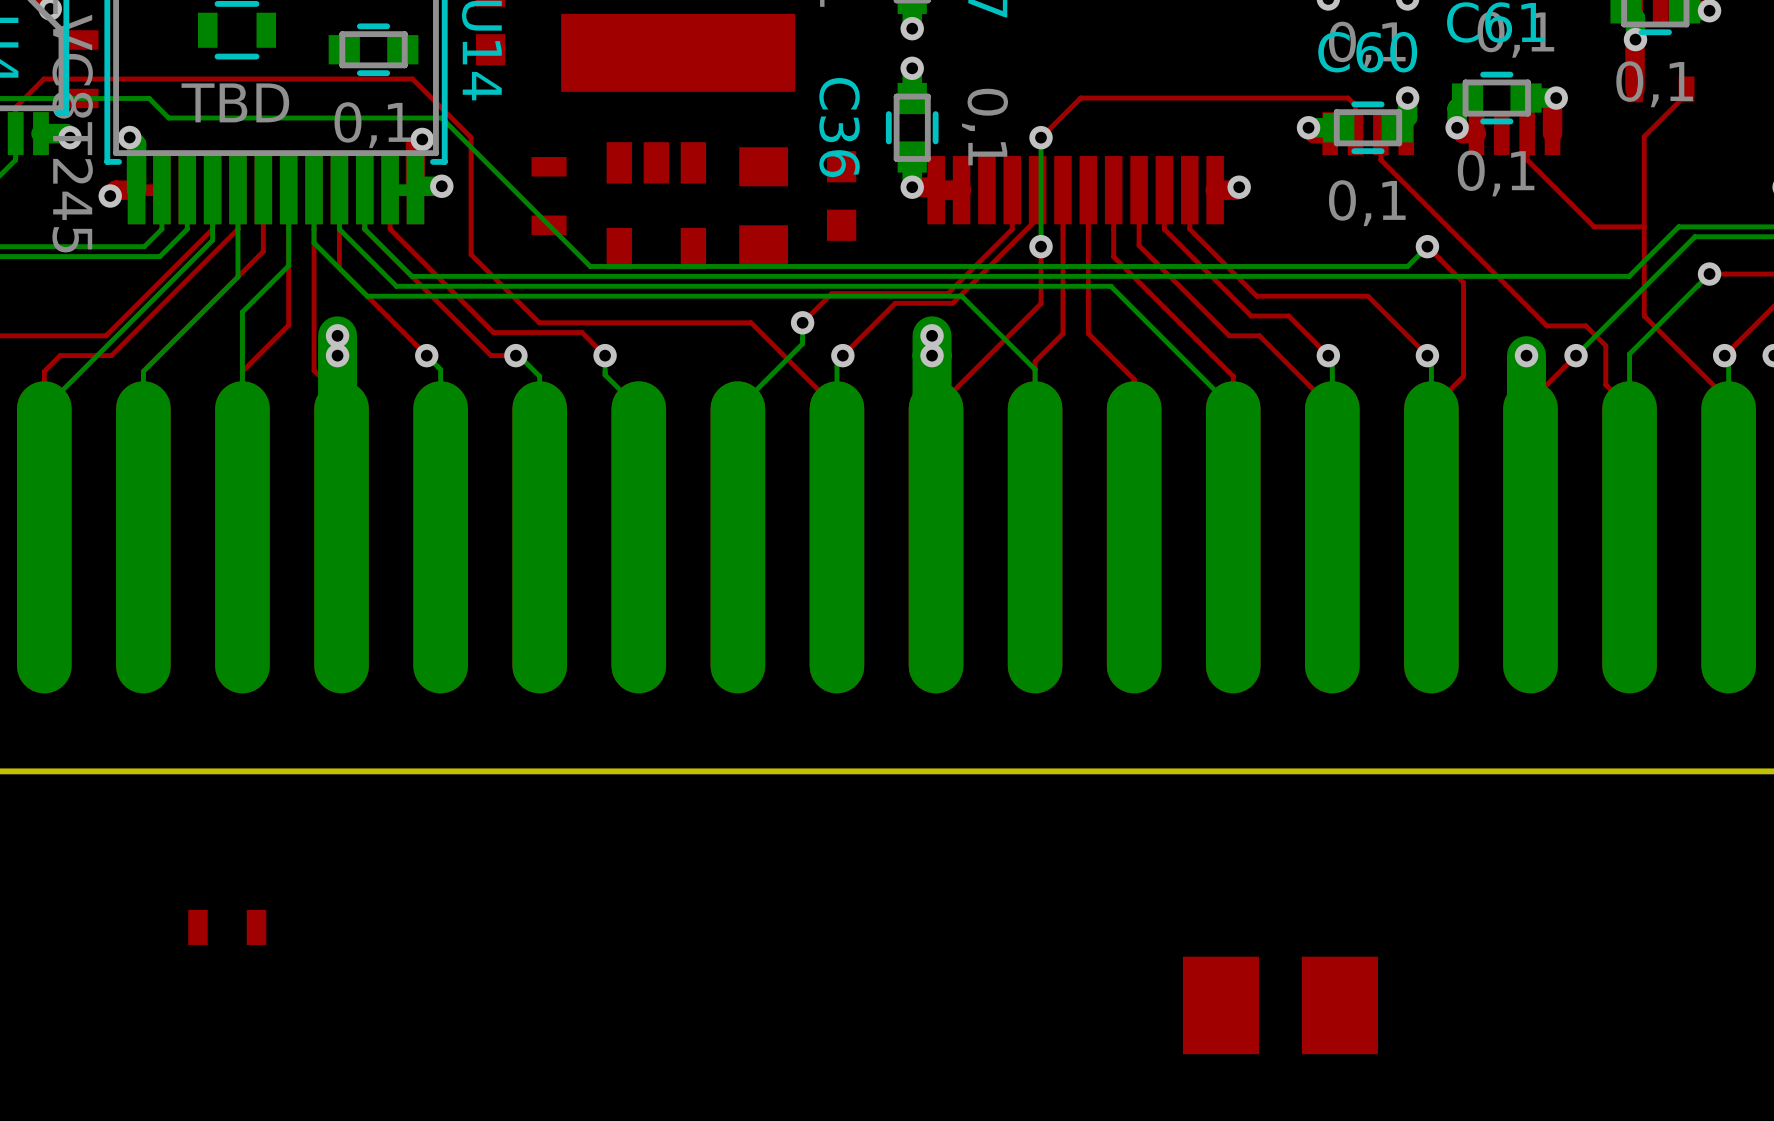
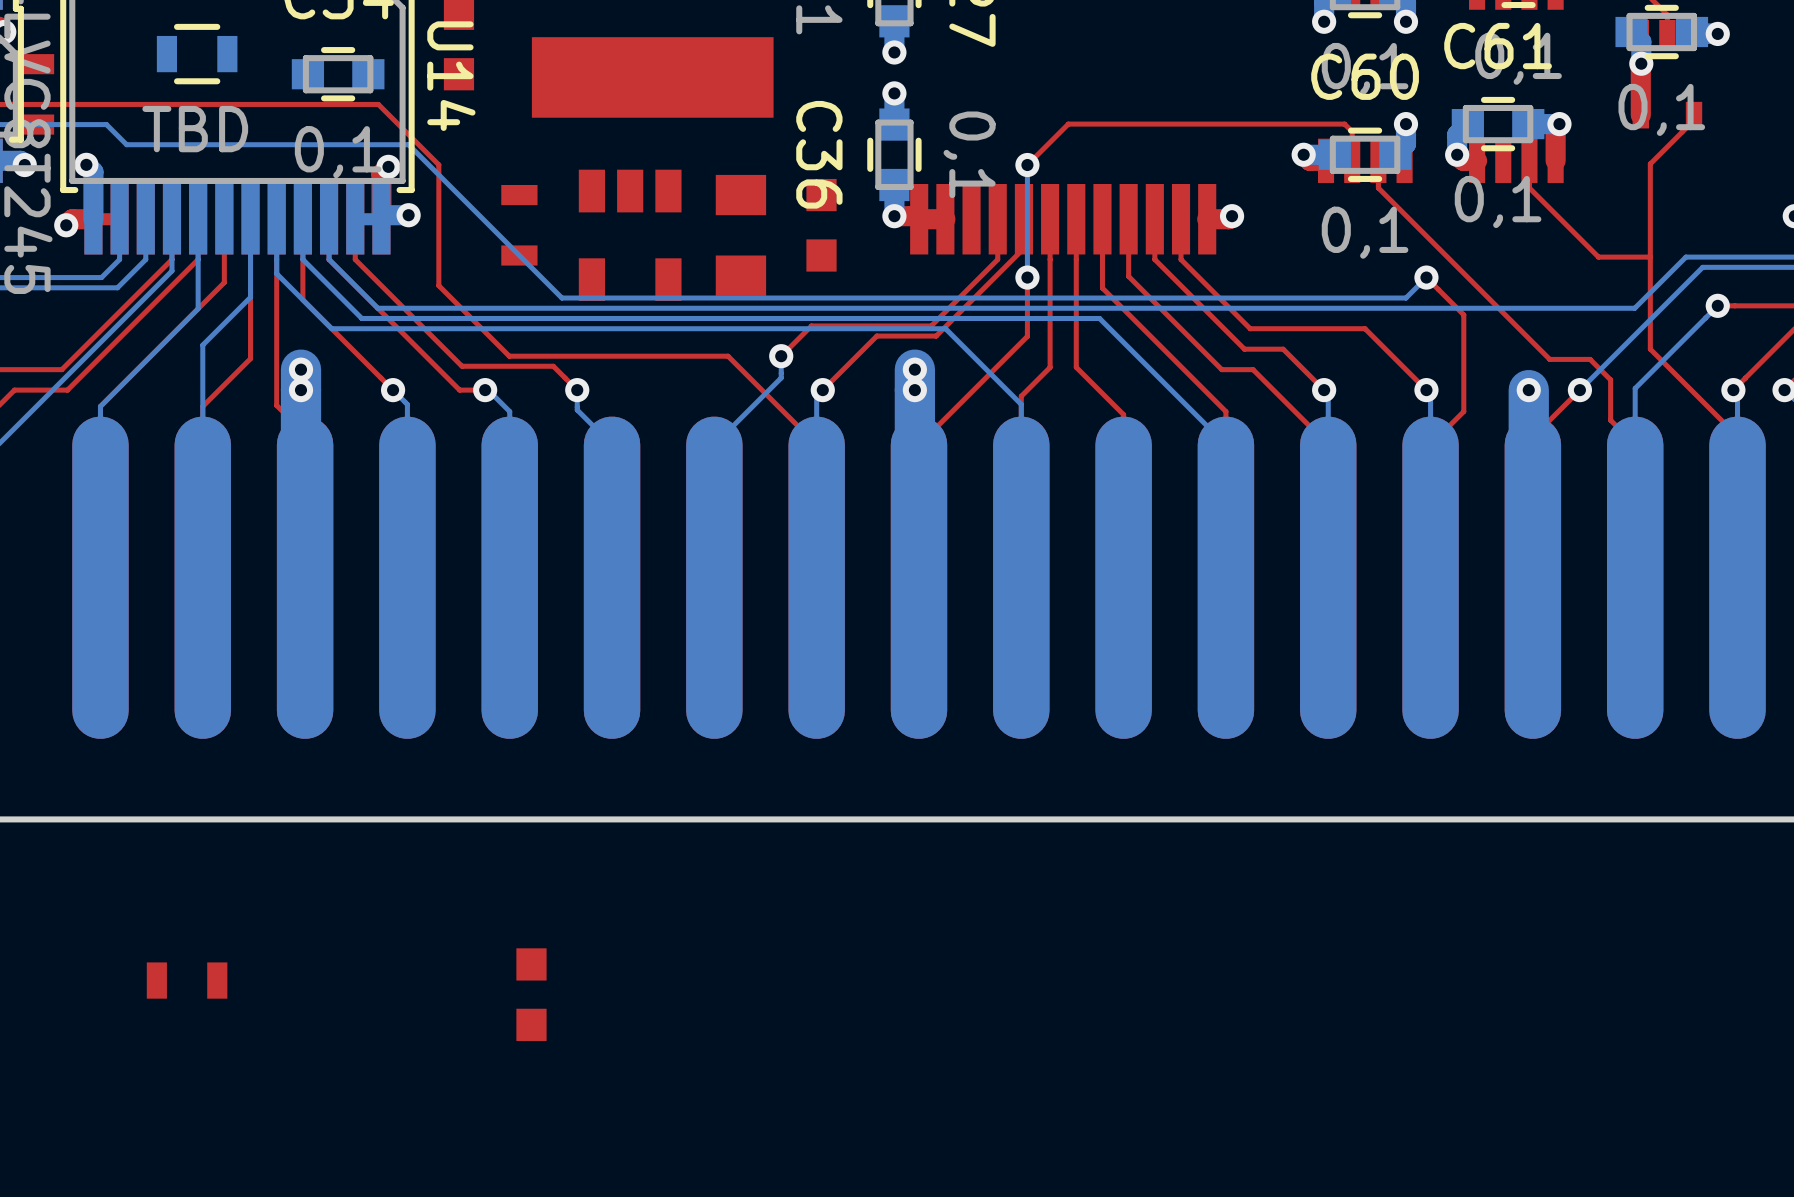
part: none -> (531, 994)
part: (1280, 1005) -> none

